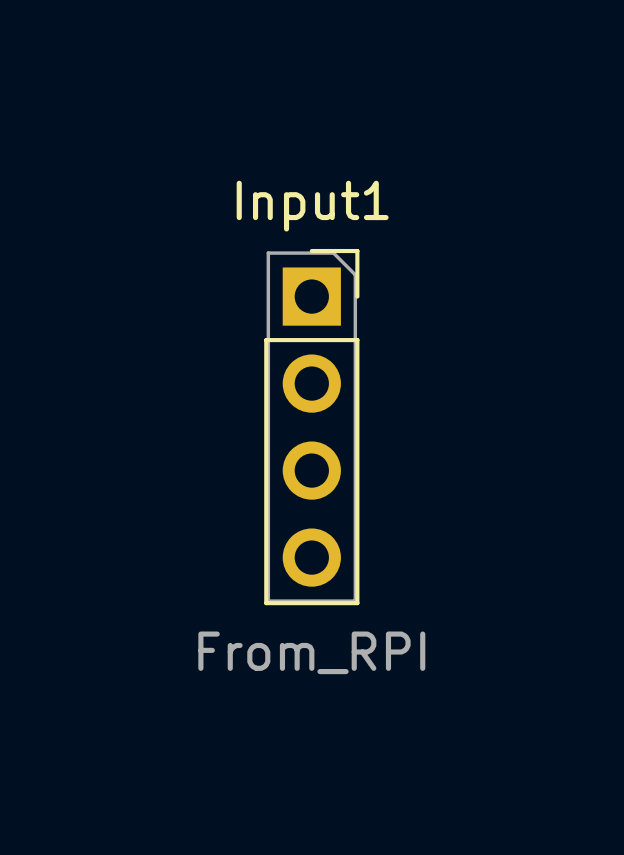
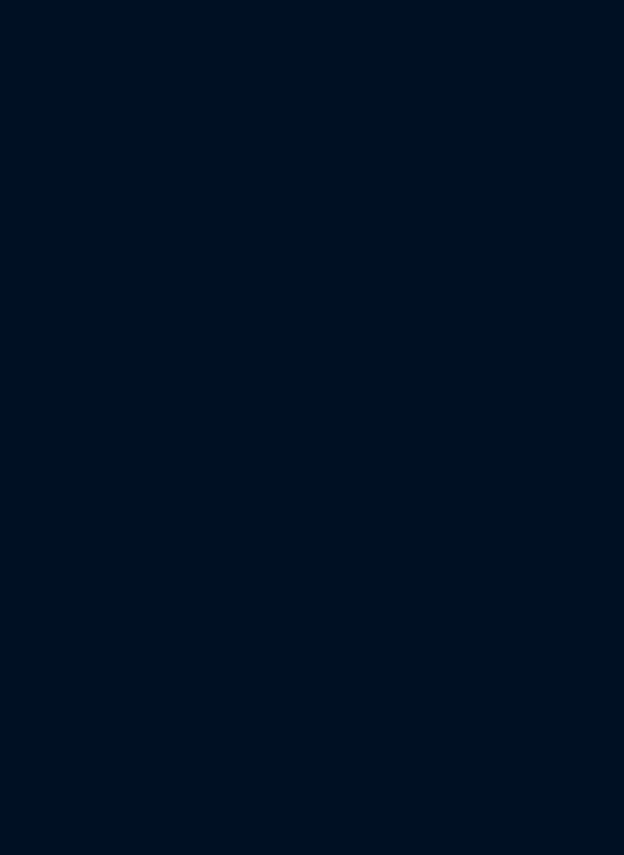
Input1: From_RPI (311, 427) -> none

